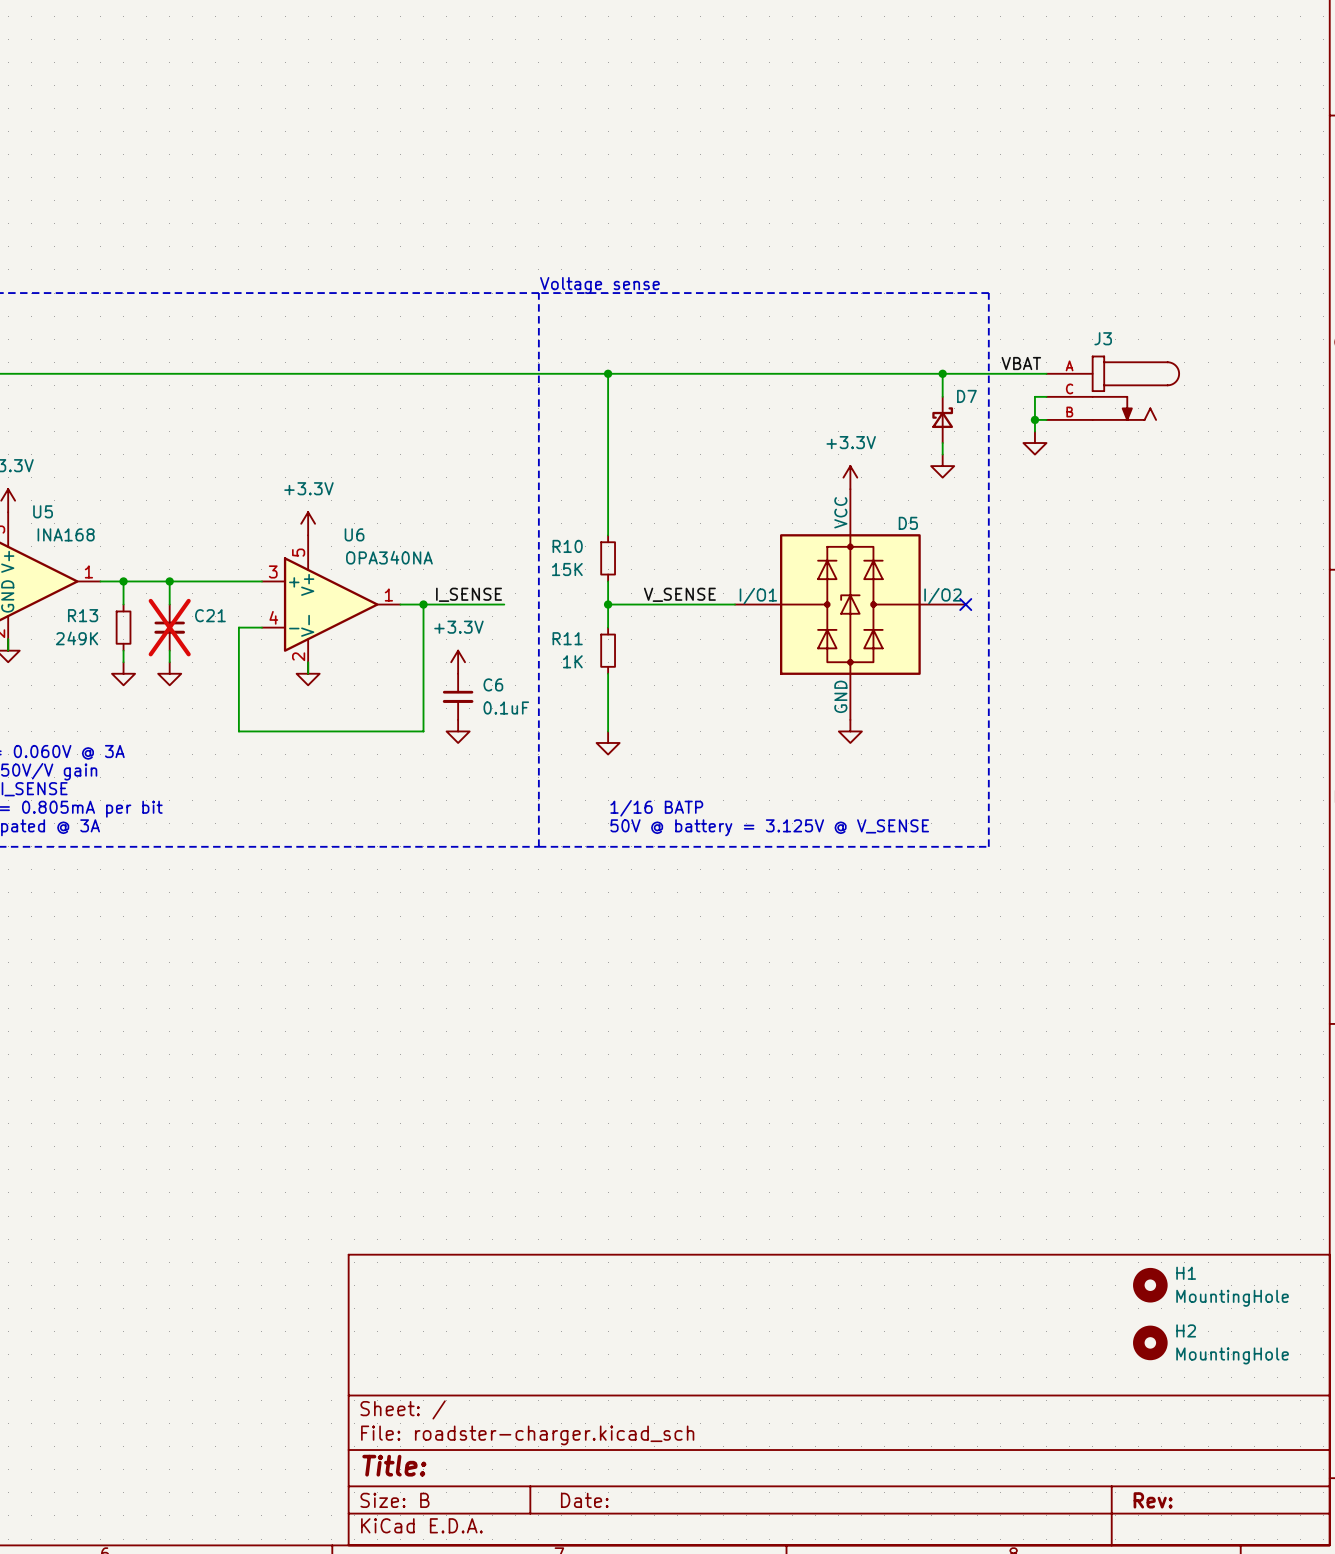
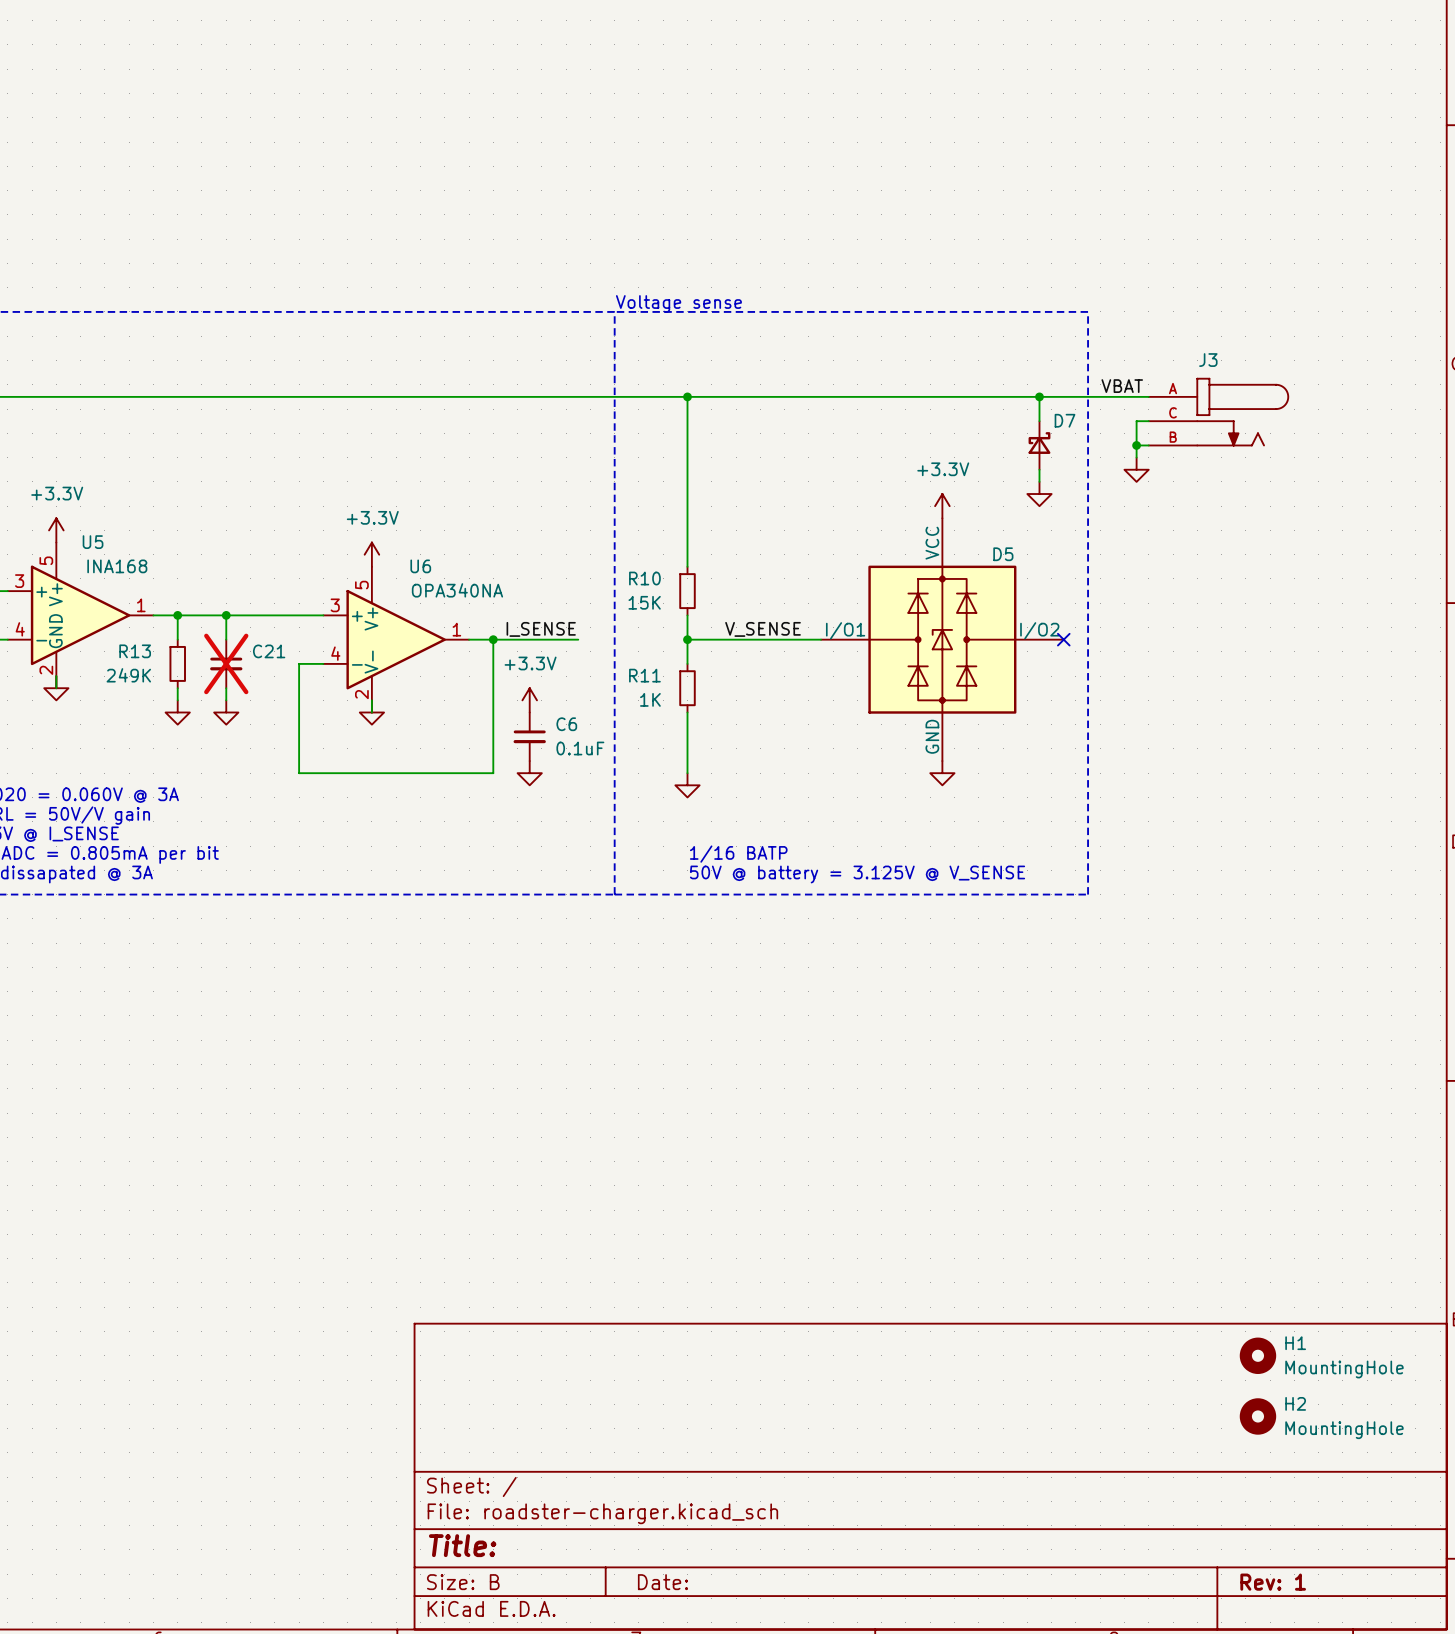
title block: Rev: (1153, 1500) -> Rev: 1 (1273, 1582)

